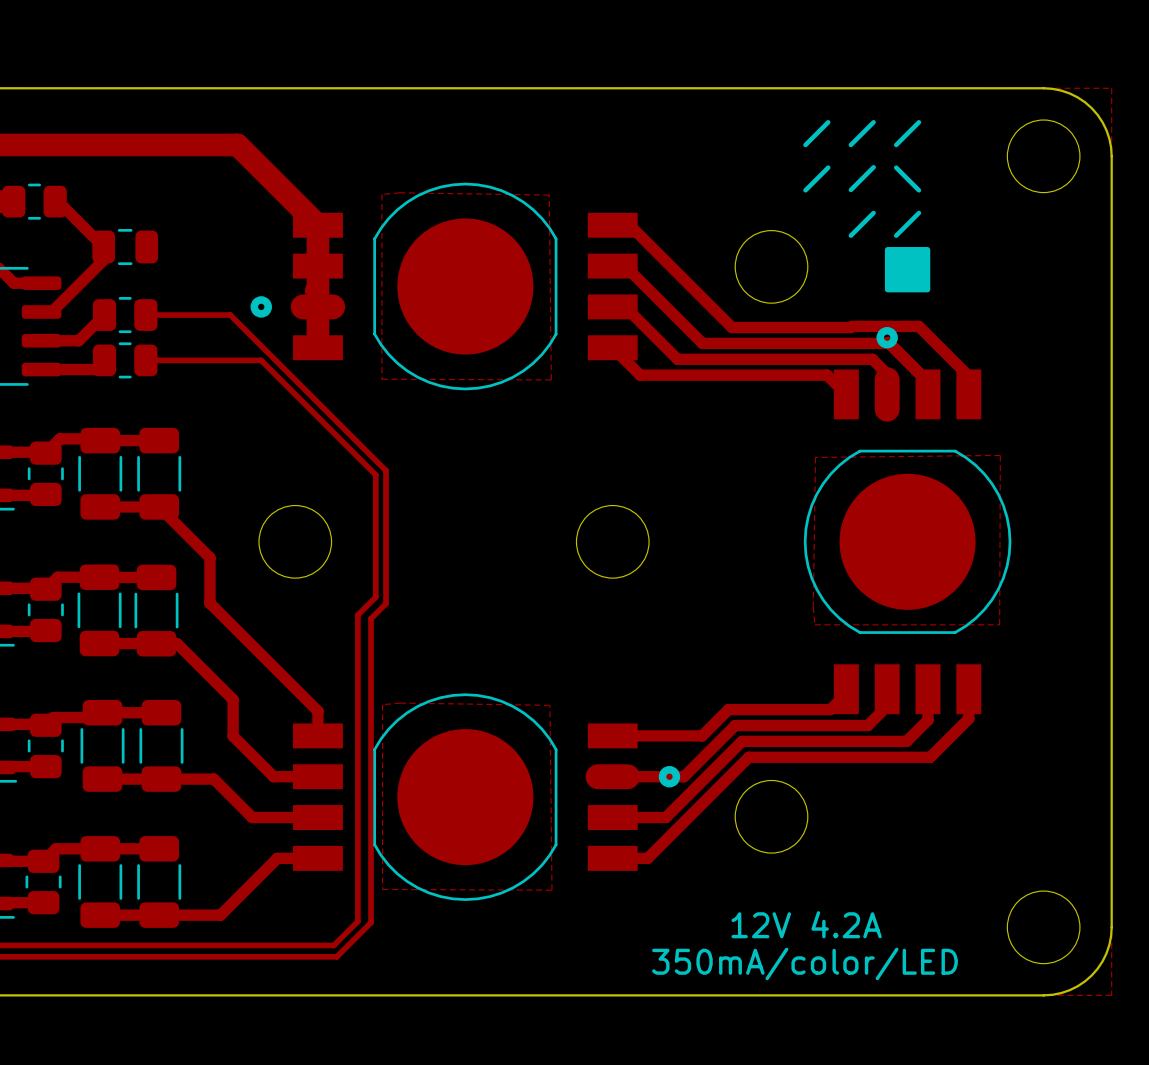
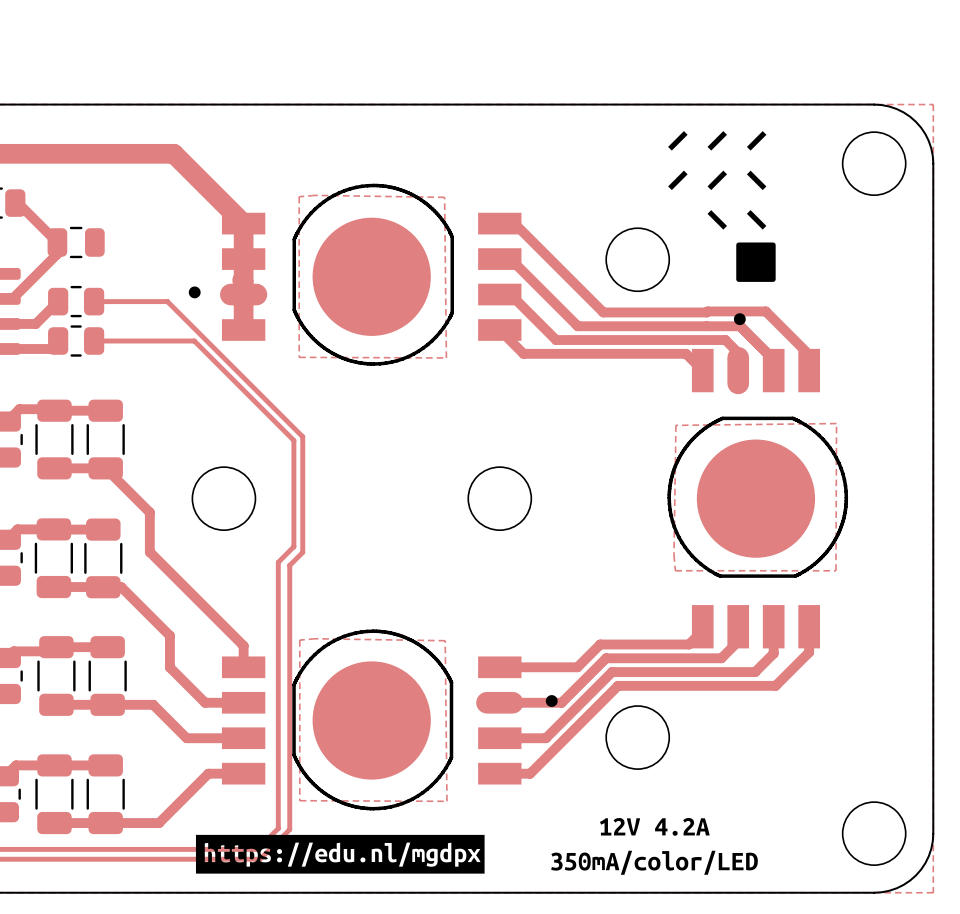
drawing: none -> [668, 131, 767, 230]
line: (828, 122) (805, 144) -> none
line: (873, 122) (850, 144) -> none
line: (918, 122) (896, 144) -> none
line: (828, 167) (805, 190) -> none
line: (873, 167) (850, 189) -> none
line: (896, 167) (918, 190) -> none
part footprint: [250, 182, 638, 391] -> [219, 212, 522, 341]
line: (873, 212) (850, 235) -> none
line: (918, 212) (896, 235) -> none
line: none -> (450, 232) (440, 217) (428, 205) (413, 195) (397, 188) (379, 185) (361, 186) (344, 190) (328, 198) (307, 217) (294, 239) (294, 310) (299, 320) (309, 334) (322, 346) (336, 355) (353, 361) (370, 363) (385, 363) (403, 358) (418, 351) (440, 332) (452, 312) (452, 237) (449, 232)
drawing: none -> [188, 286, 201, 299]
part footprint: [803, 327, 1012, 715] -> [691, 346, 820, 649]
drawing: none -> [733, 313, 746, 326]
line: none -> (722, 418) (705, 428) (692, 439) (681, 453) (674, 468) (670, 485) (669, 503) (672, 521) (679, 537) (696, 560) (720, 576) (795, 576) (798, 574) (812, 565) (824, 554) (841, 526) (846, 497) (844, 479) (838, 463) (830, 448) (818, 435) (792, 418) (722, 418)
part footprint: [293, 693, 681, 901] -> [221, 656, 524, 785]
line: none -> (373, 631) (355, 633) (333, 641) (314, 654) (300, 672) (294, 684) (294, 755) (307, 777) (326, 794) (349, 805) (373, 808) (391, 806) (412, 798) (431, 785) (446, 767) (451, 757) (451, 682) (437, 660) (420, 645) (396, 634) (373, 631)
drawing: none -> [545, 695, 558, 707]
drawing: none -> [551, 818, 758, 875]
text: 12V 4.2A (806, 924) -> none
drawing: none -> [195, 834, 485, 874]
text: 350mA/color/LED (804, 963) -> none

